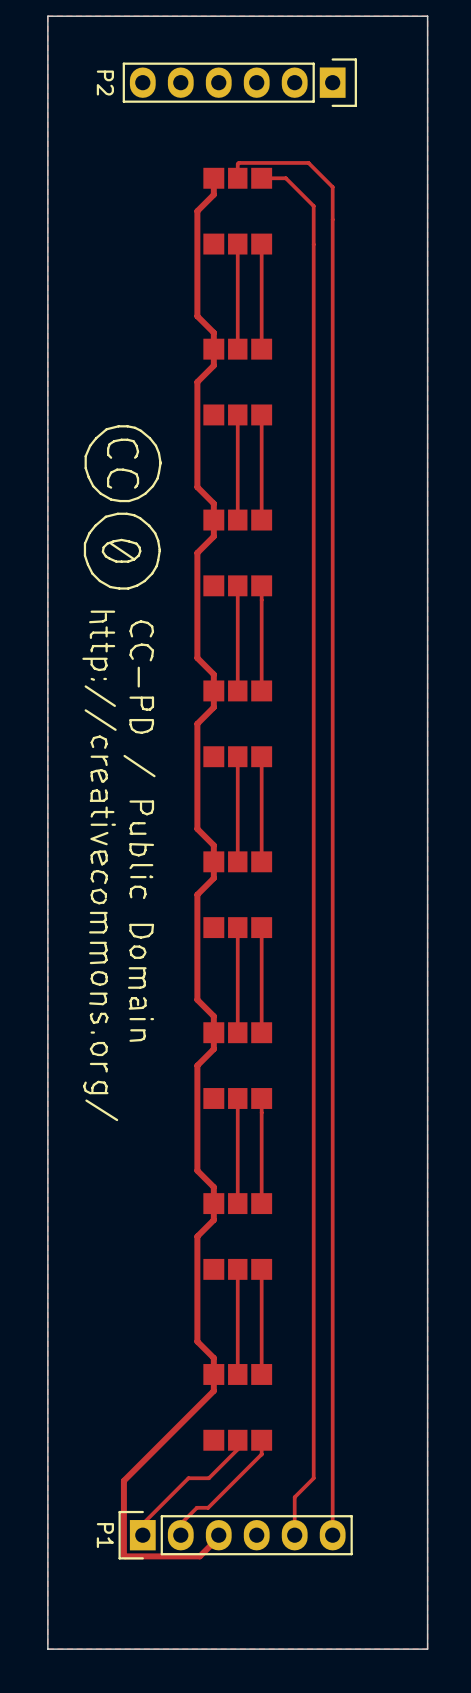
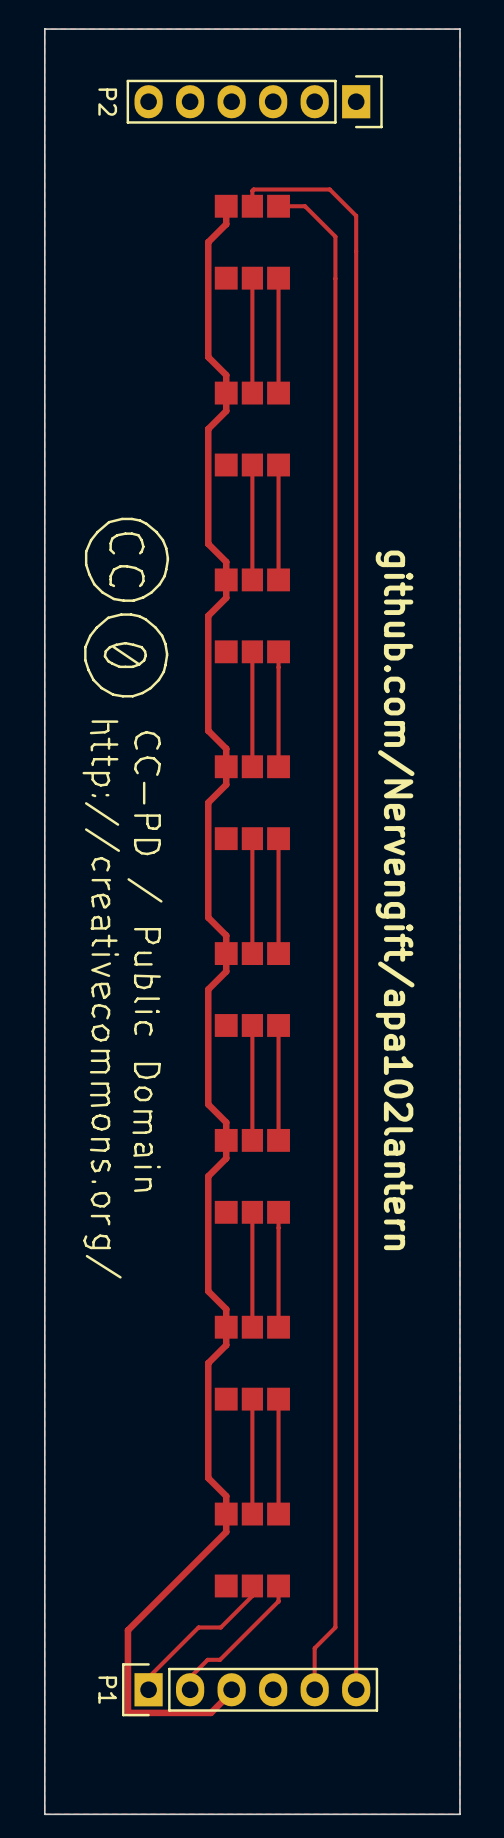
drawing position: (121, 773) -> (125, 898)
text: none -> github.com/Nervengift/apa102lantern (395, 900)

